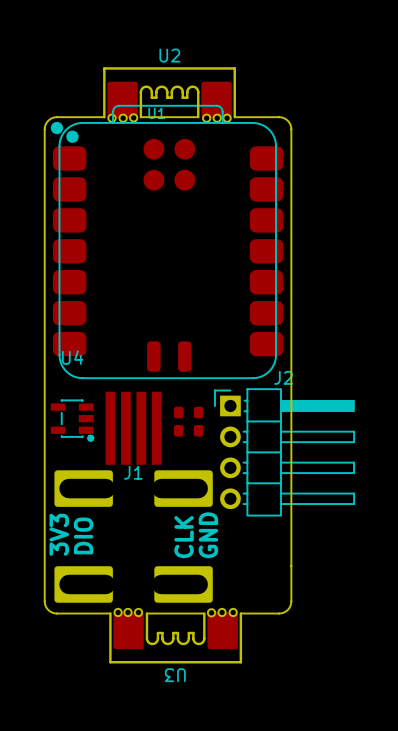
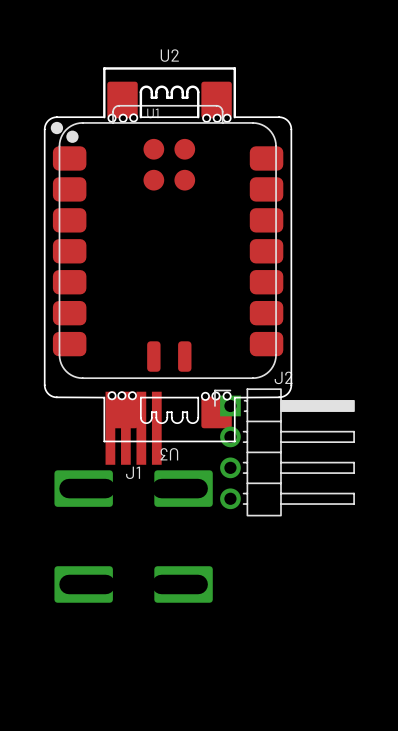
board edge: (44, 385) (45, 604) (48, 609) (55, 613) (110, 613) -> (44, 385) (47, 392) (54, 397) (104, 397)
board edge: (291, 385) (291, 604) (287, 609) (281, 613) (240, 613) -> (291, 385) (288, 392) (281, 397) (234, 397)
part: (188, 412) -> none
U4: (72, 420) -> none
part: (188, 430) -> none
text: 3V3 (59, 534) -> none
text: DIO (83, 535) -> none
text: GND (208, 535) -> none
text: CLK (184, 537) -> none
U3 footprint: [109, 608, 243, 664] -> [103, 392, 236, 443]
board edge: (146, 613) (204, 613) -> (140, 397) (198, 397)

